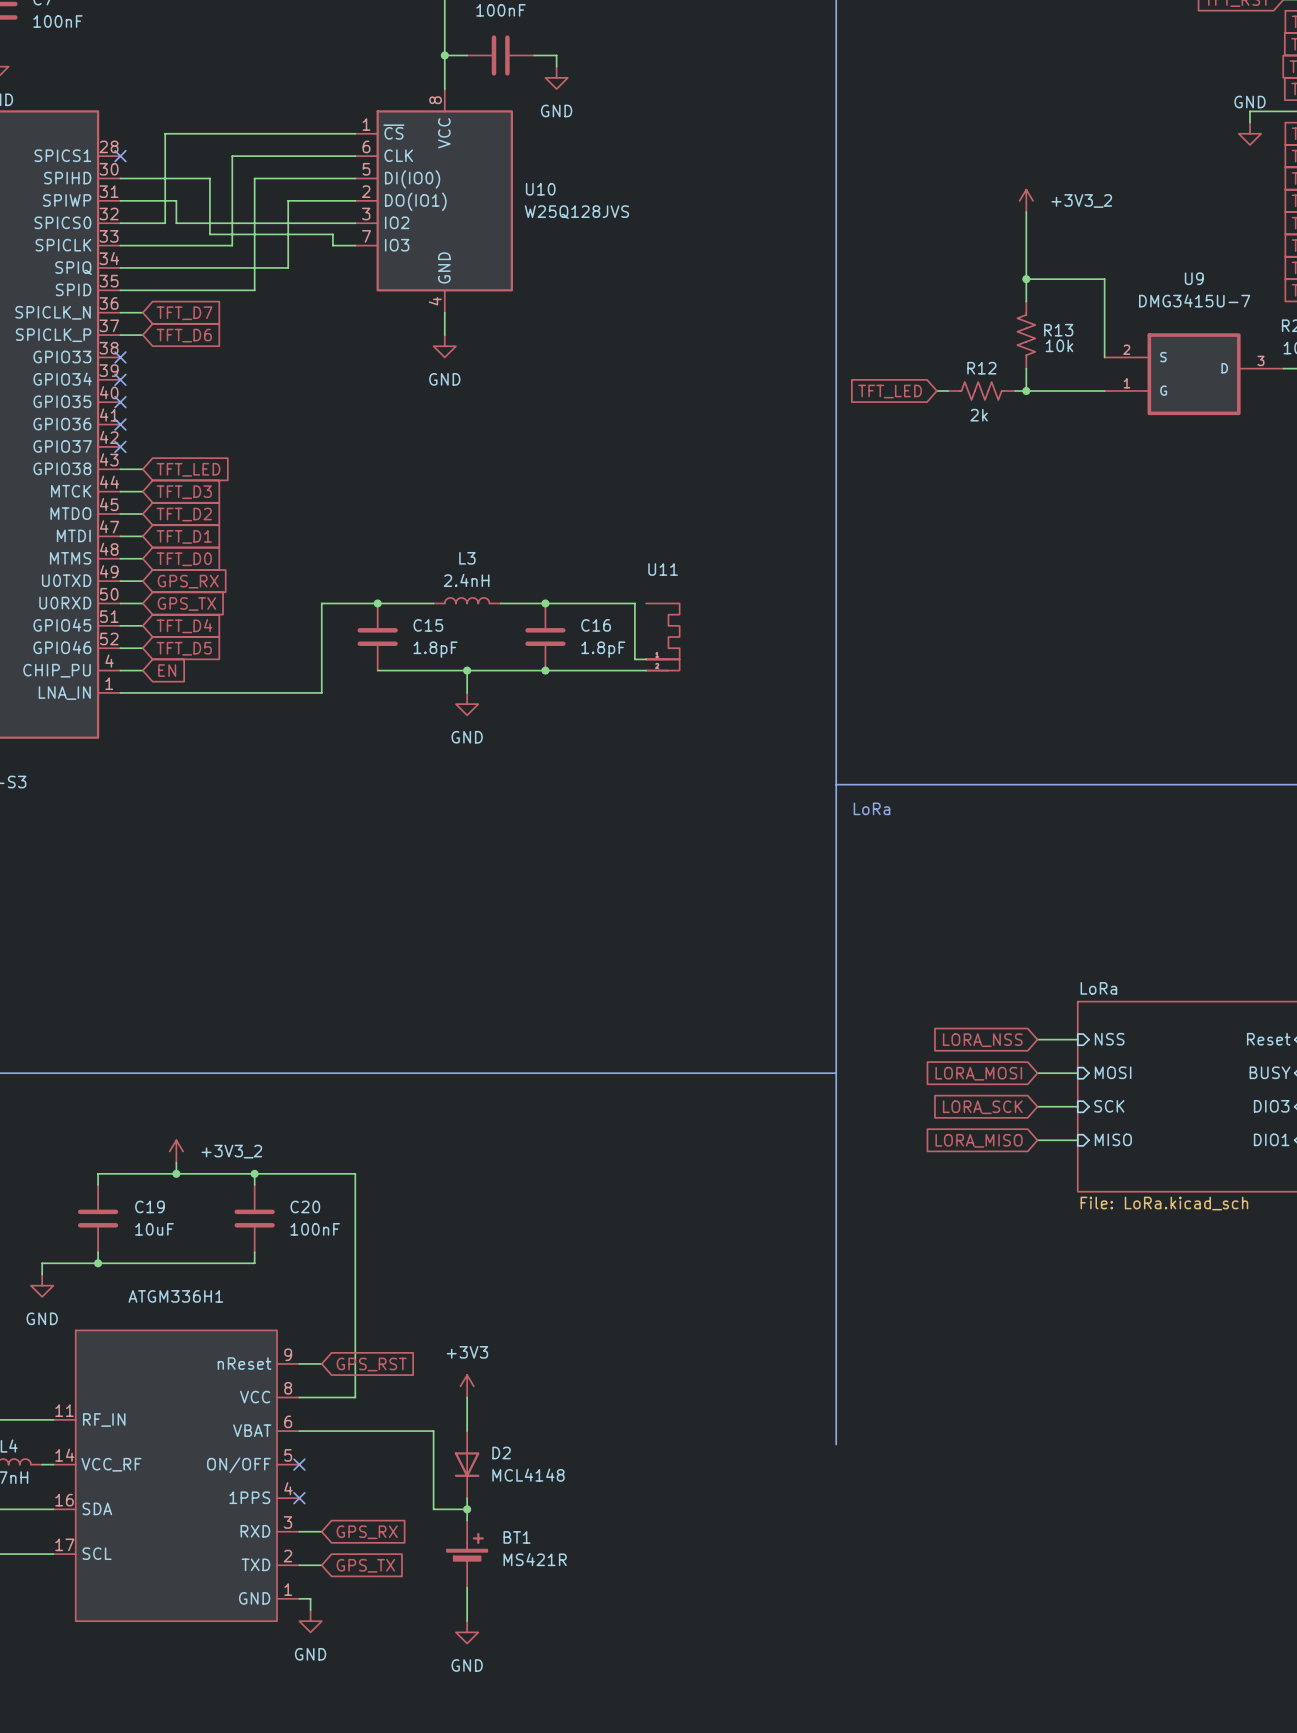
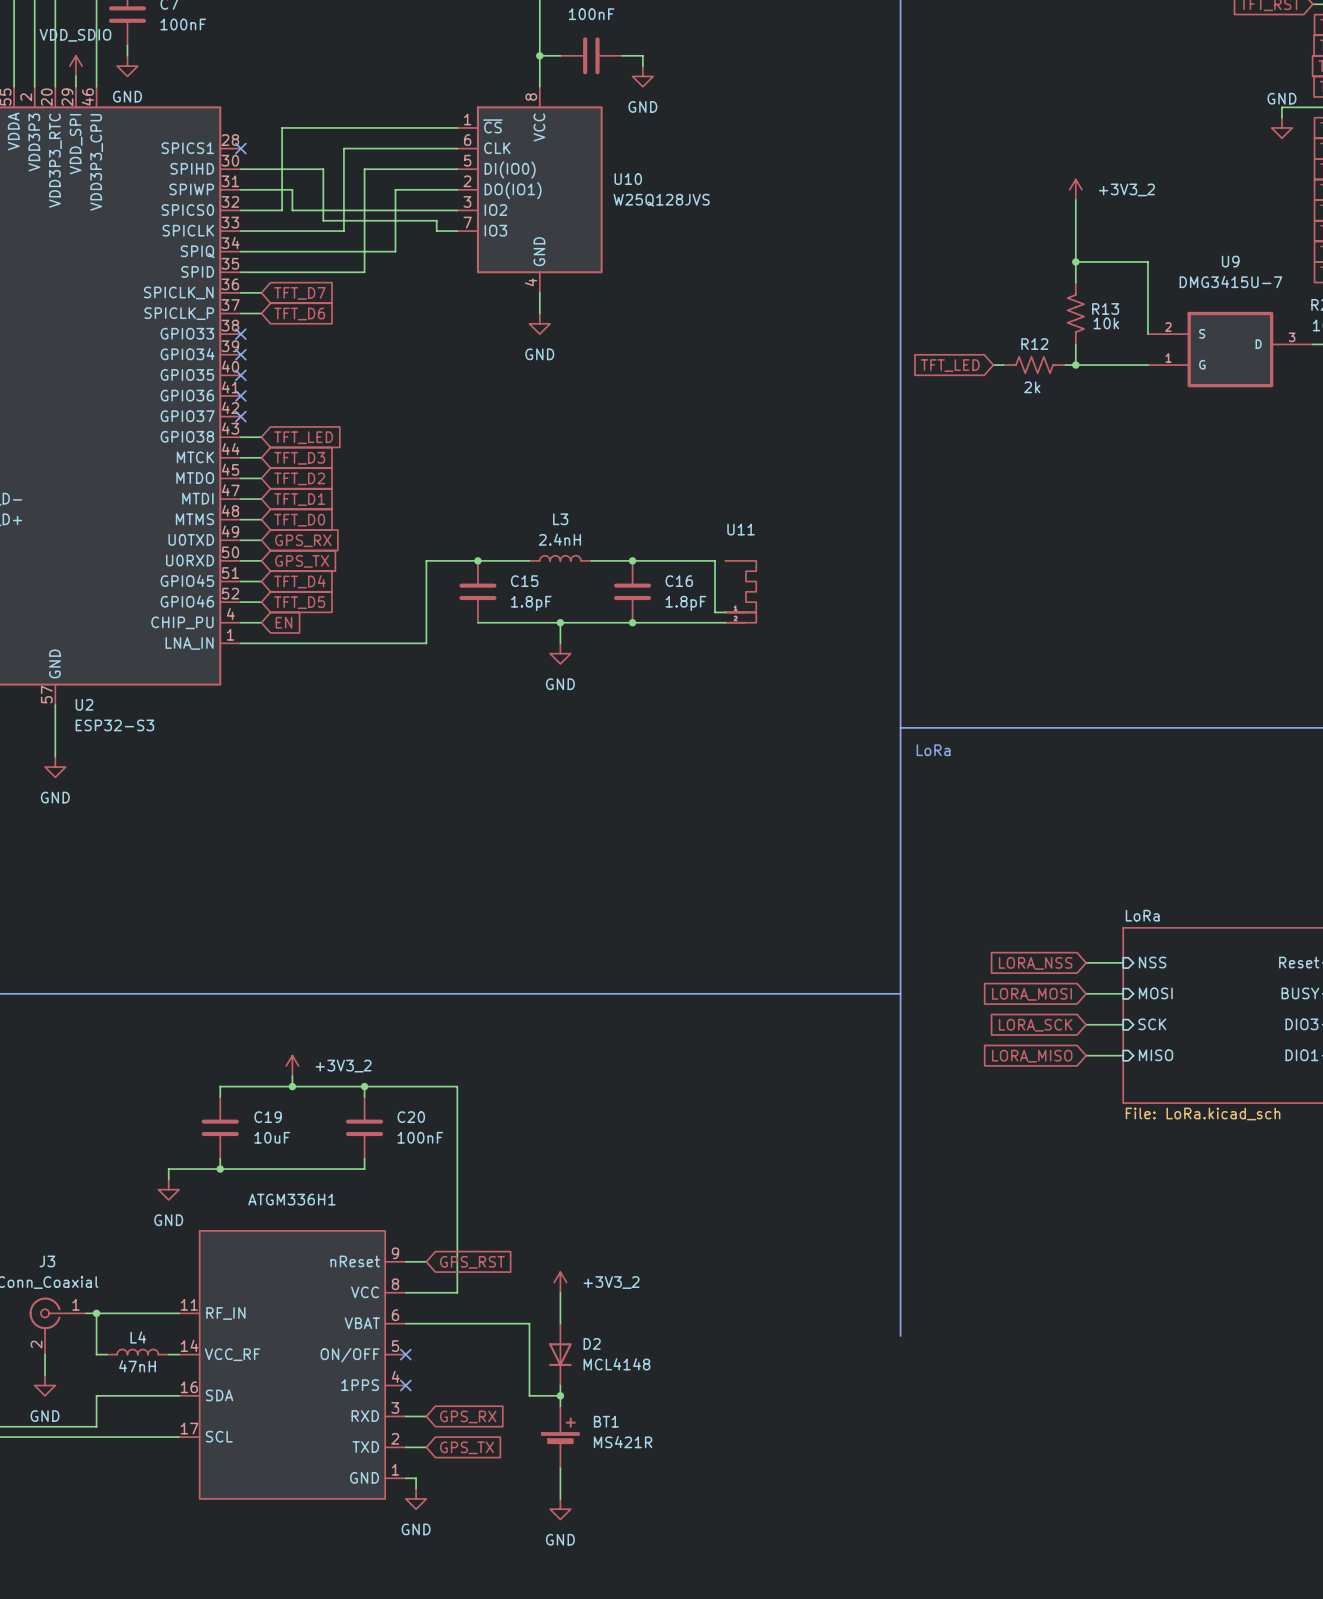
power symbol: +3V3 (467, 1386) -> +3V3_2 (560, 1282)

